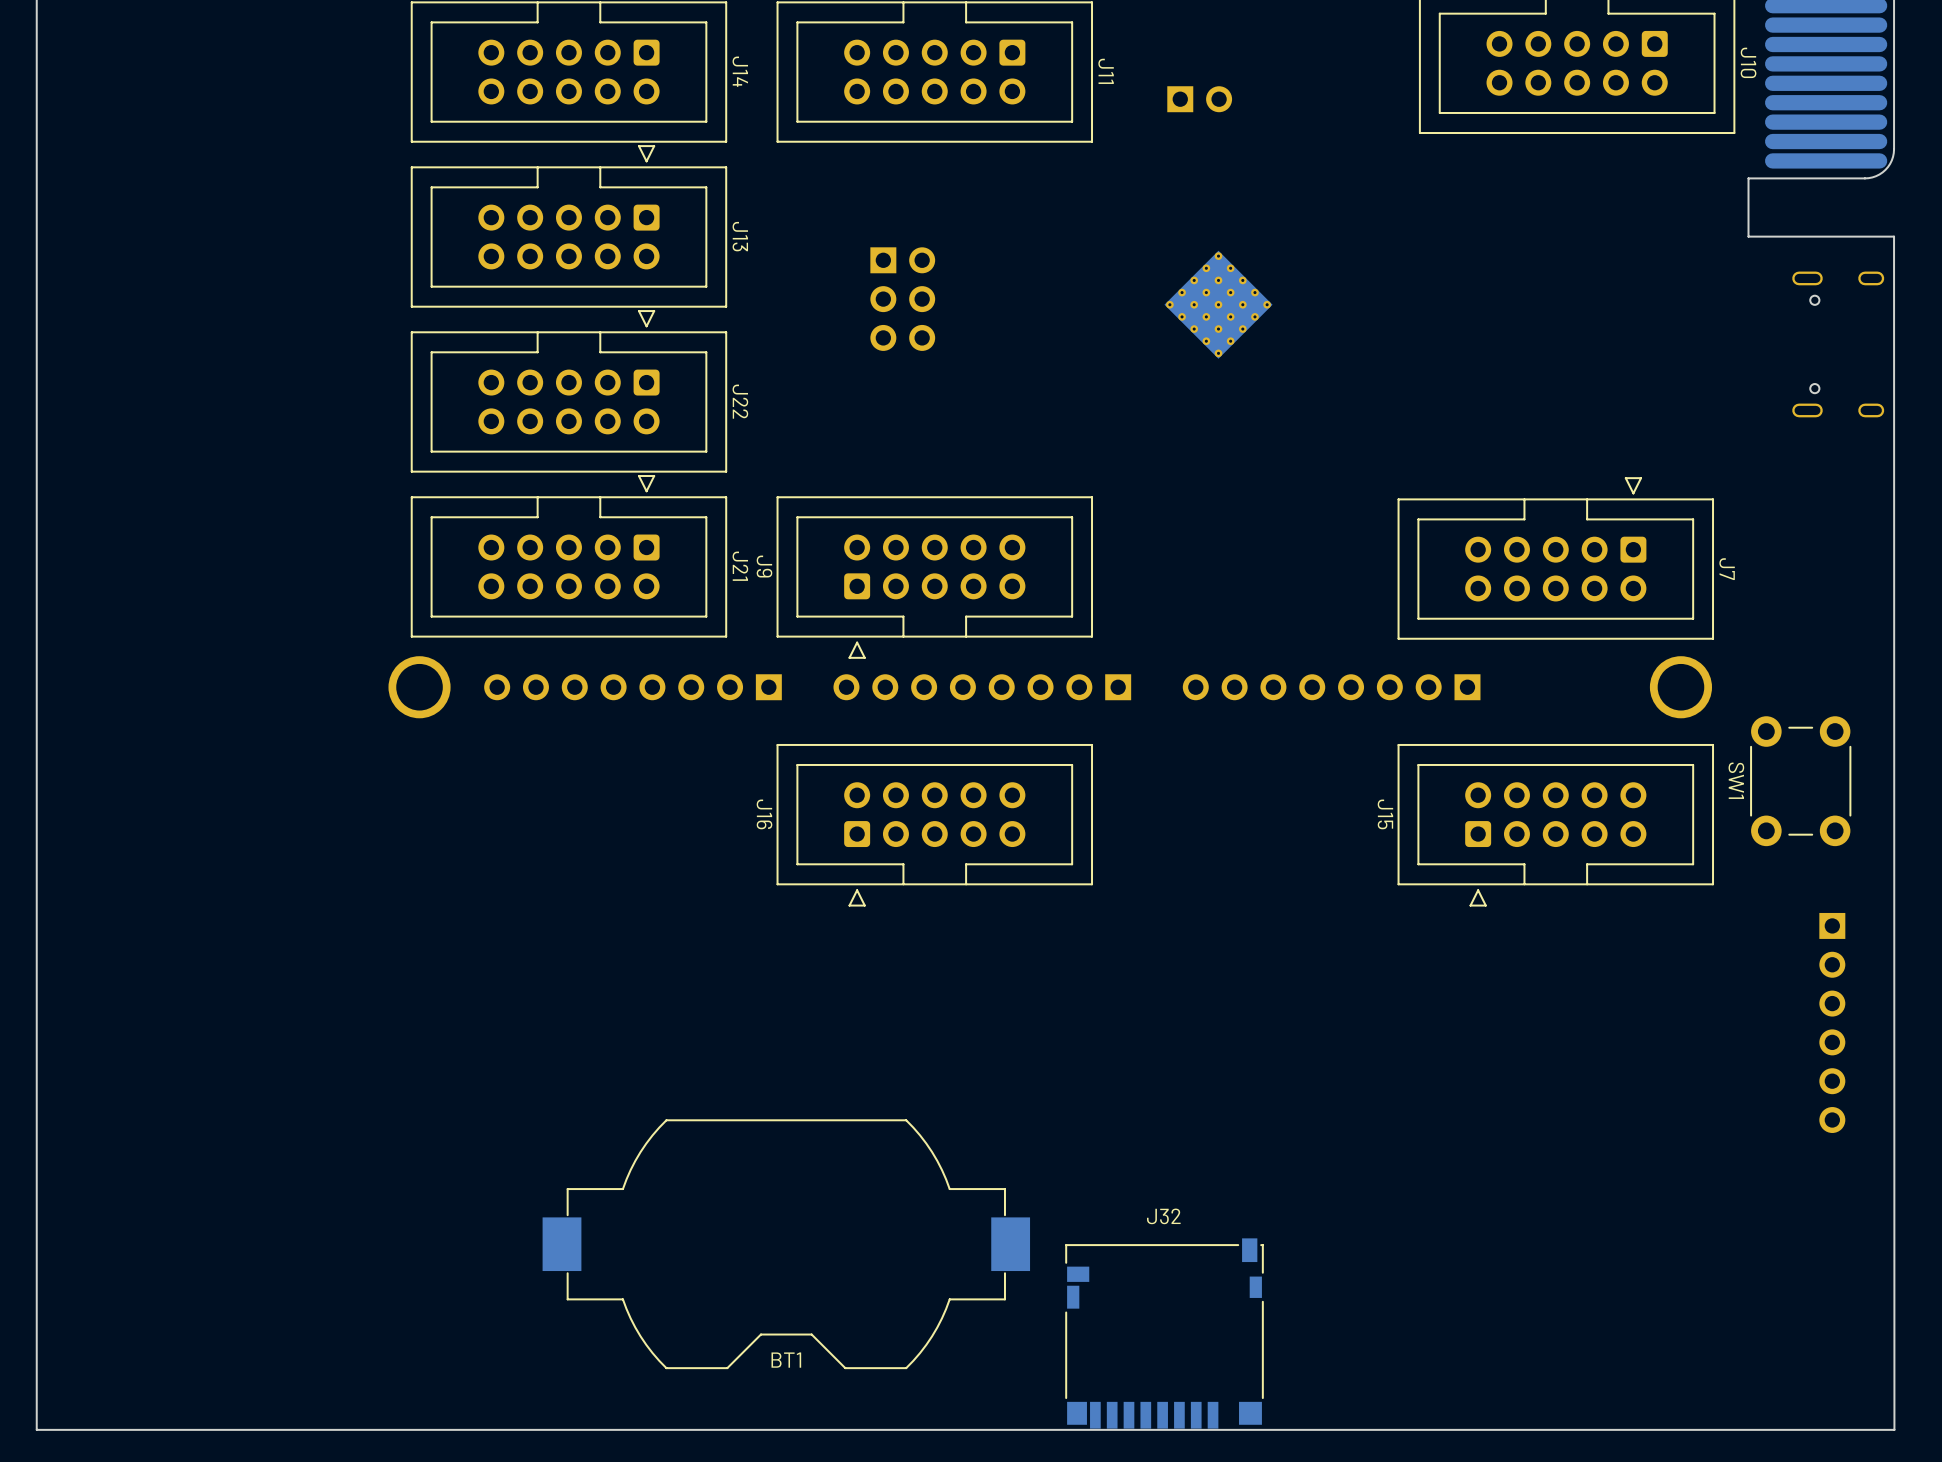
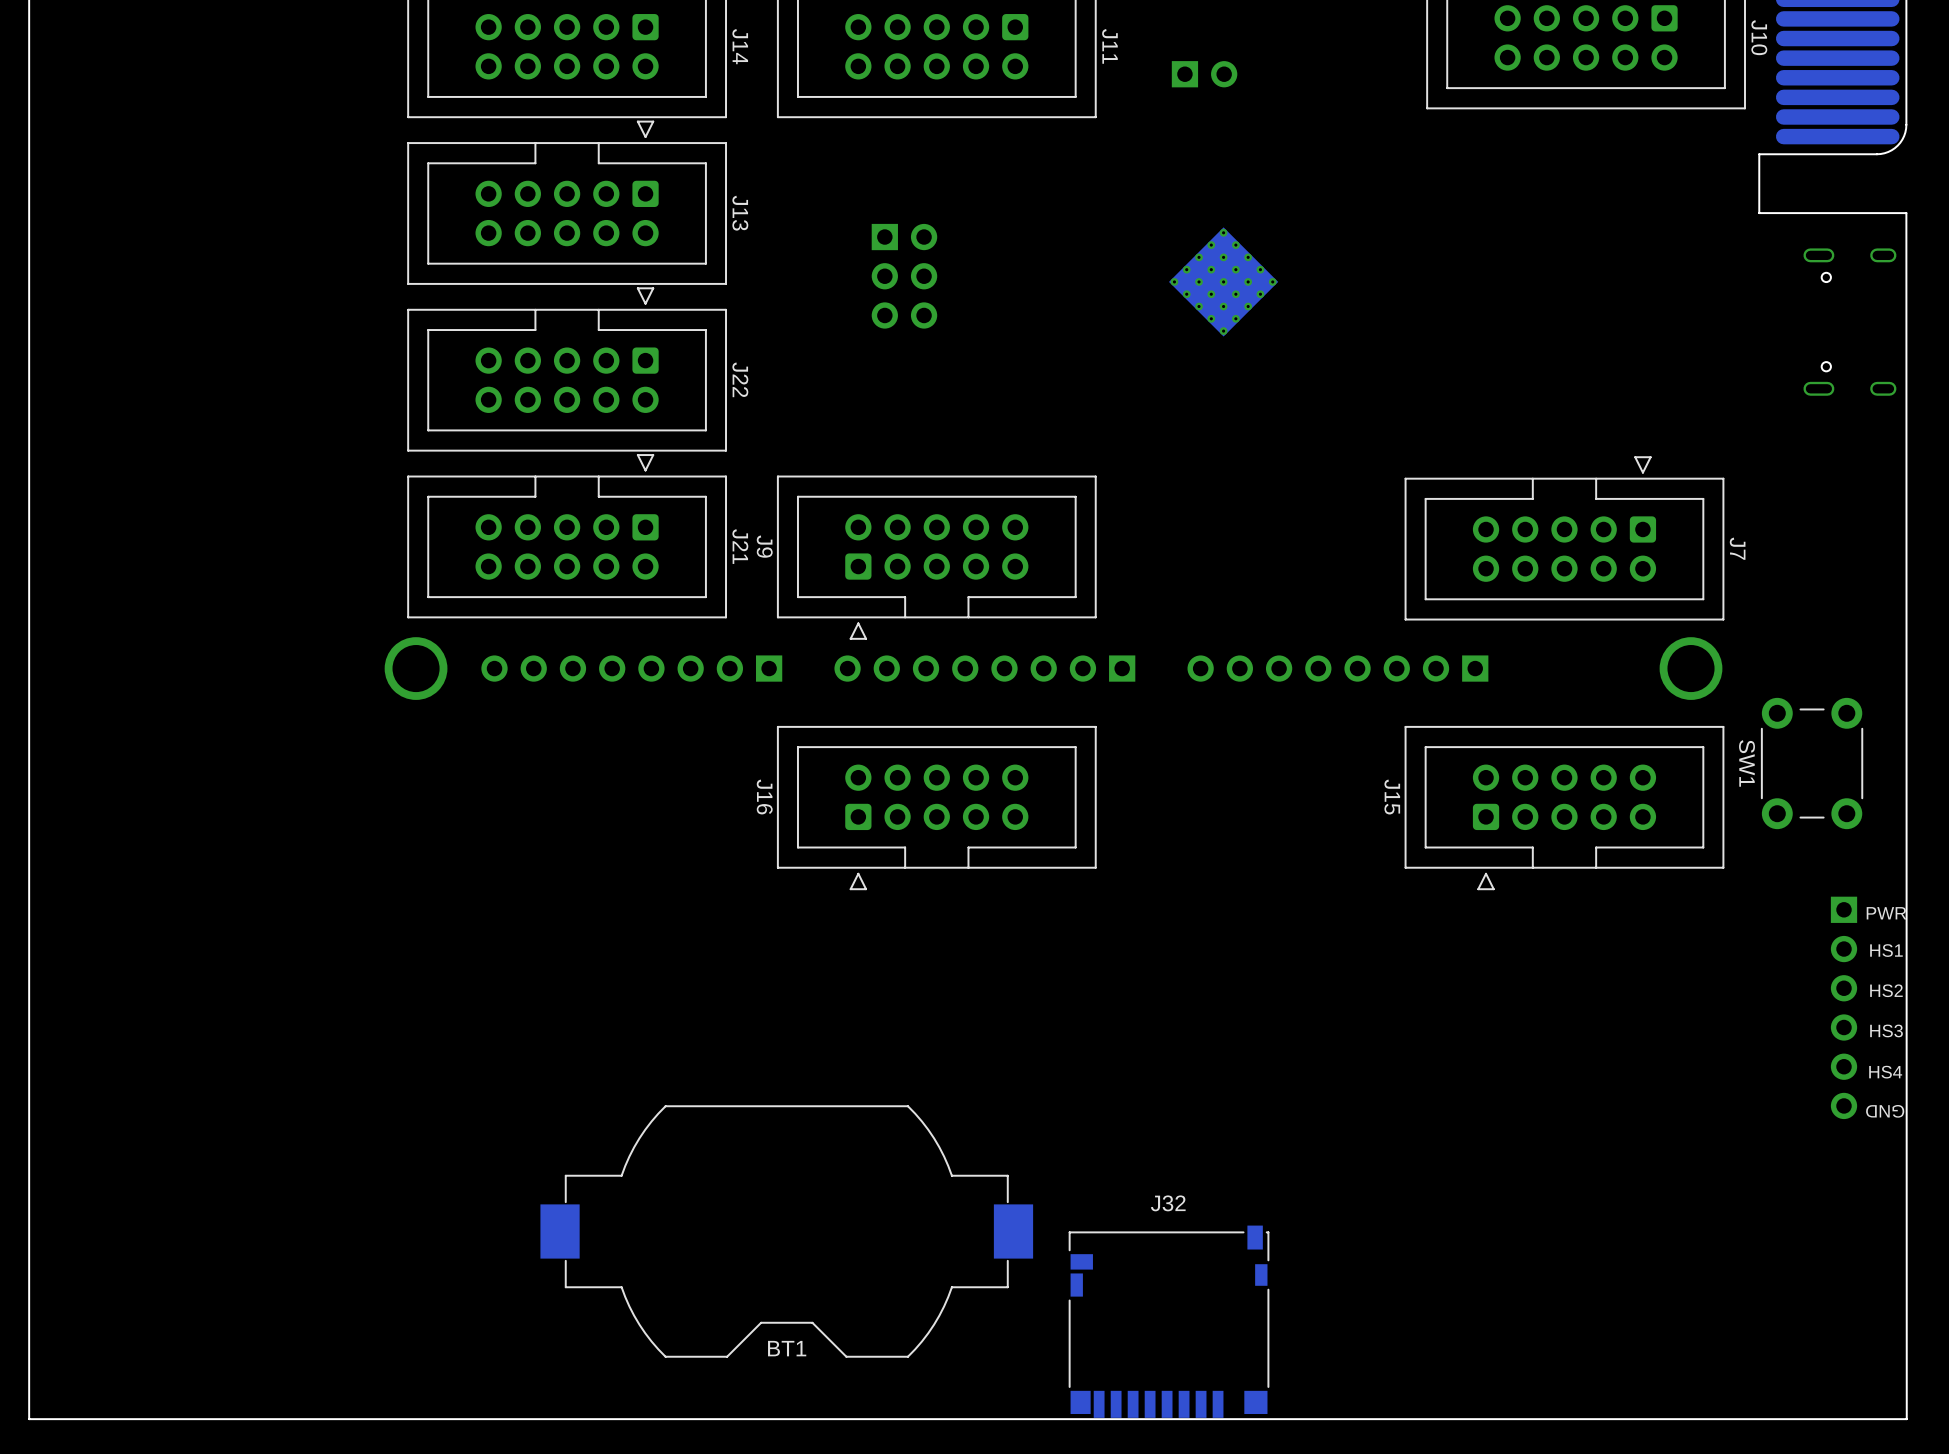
text: none -> PWR (1886, 913)
text: none -> HS1 (1886, 950)
text: none -> HS2 (1886, 990)
text: none -> HS3 (1886, 1030)
text: none -> HS4 (1885, 1072)
text: none -> GND (1885, 1111)

